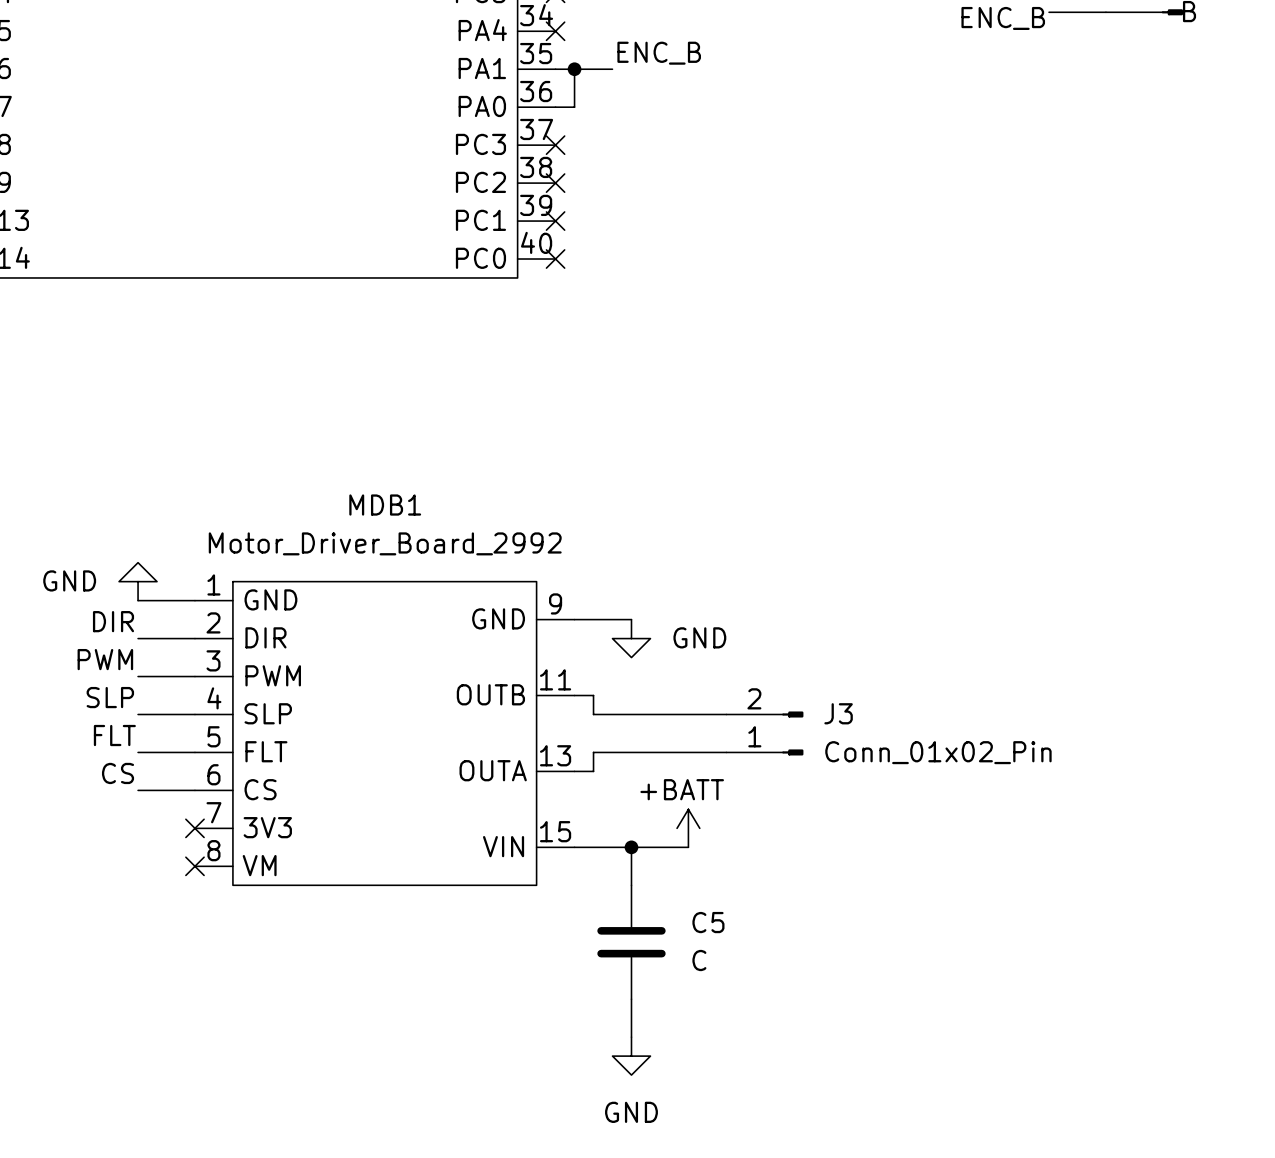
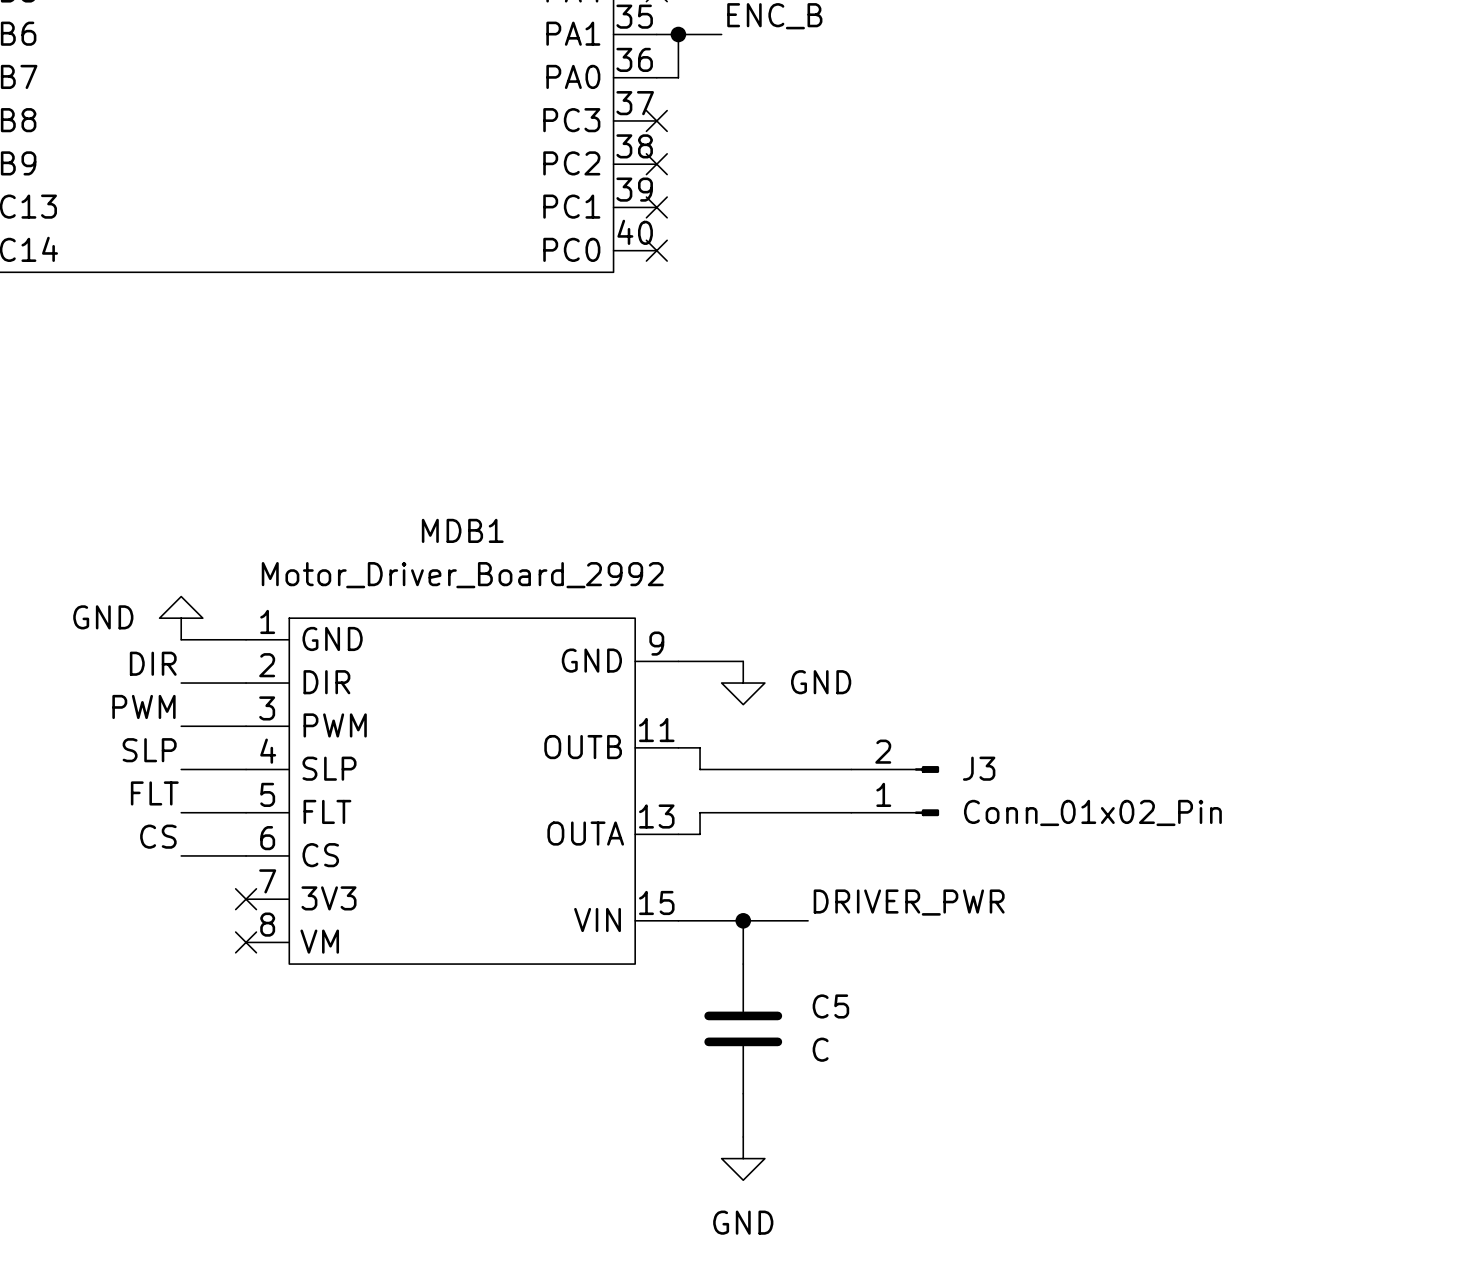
power symbol: +BATT (688, 828) -> none
label: none -> DRIVER_PWR (909, 902)

